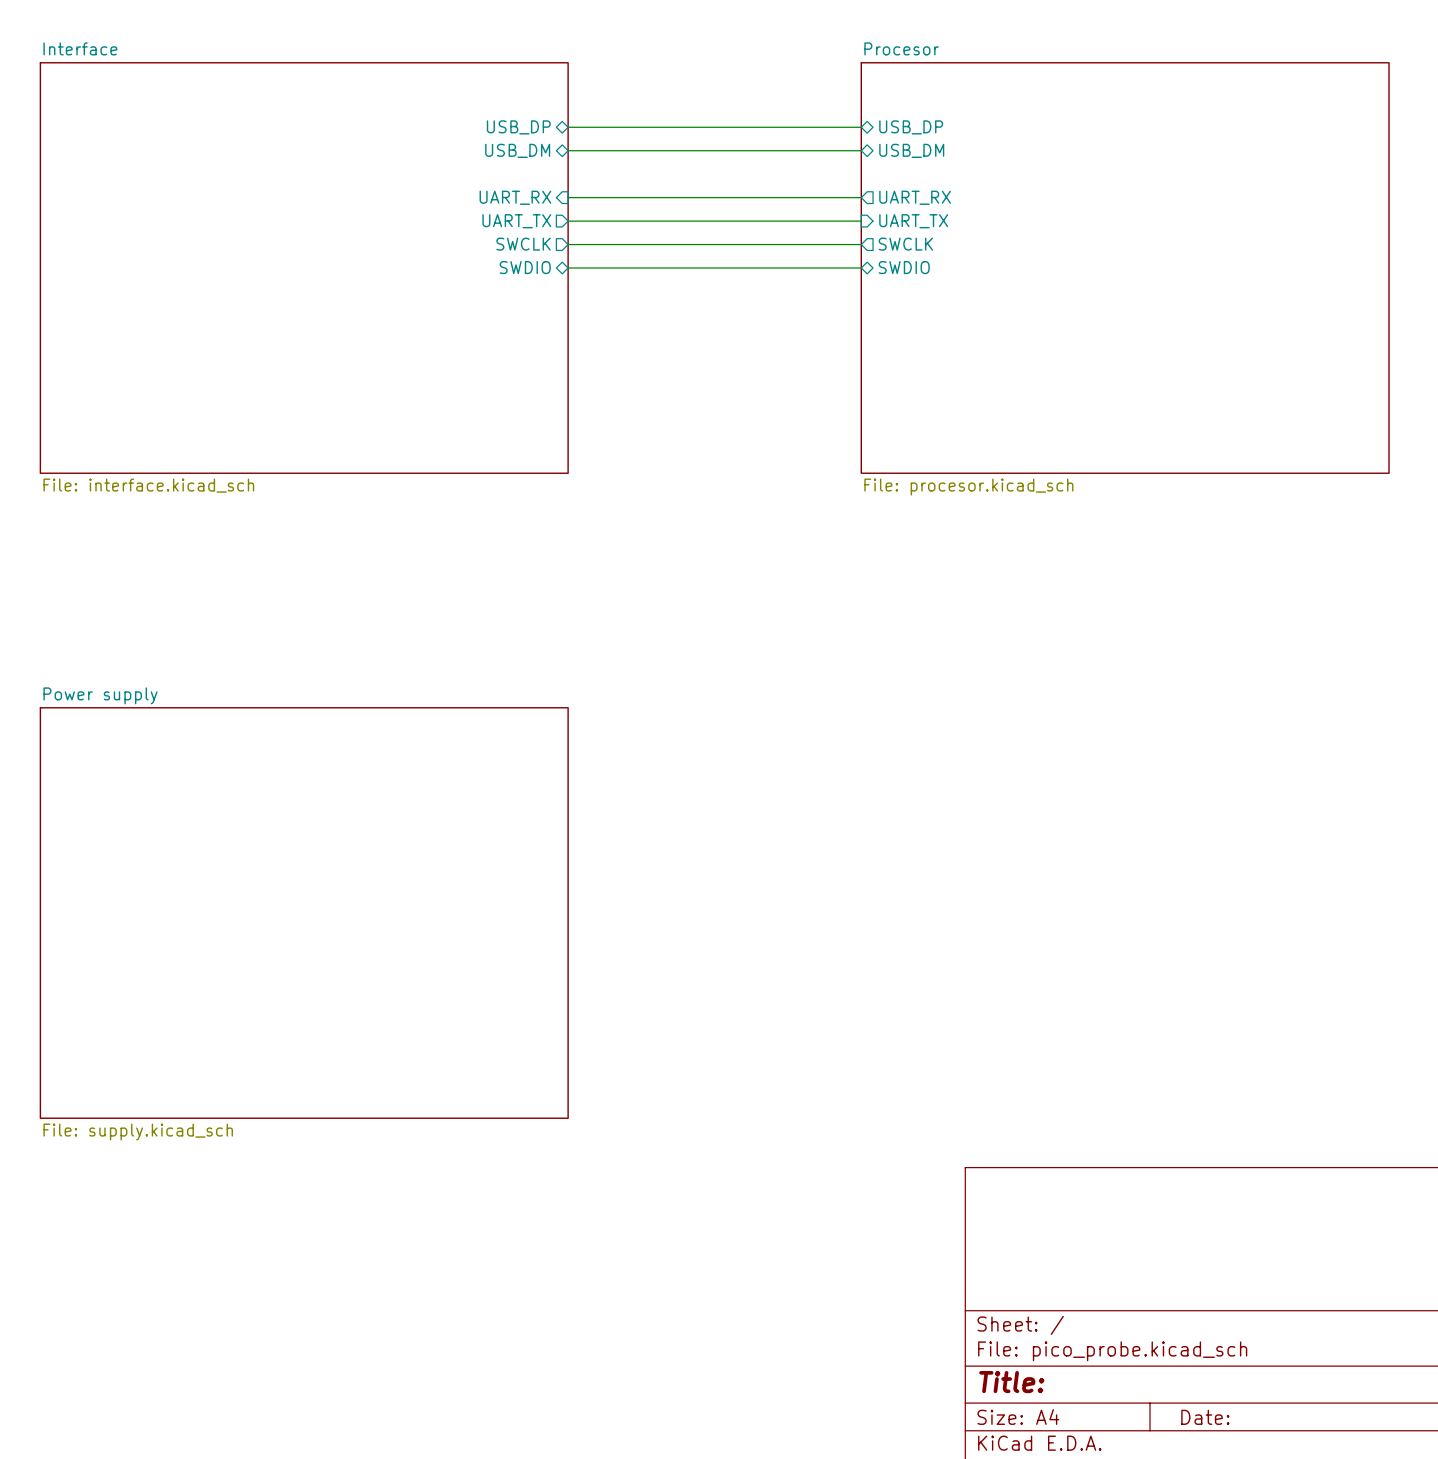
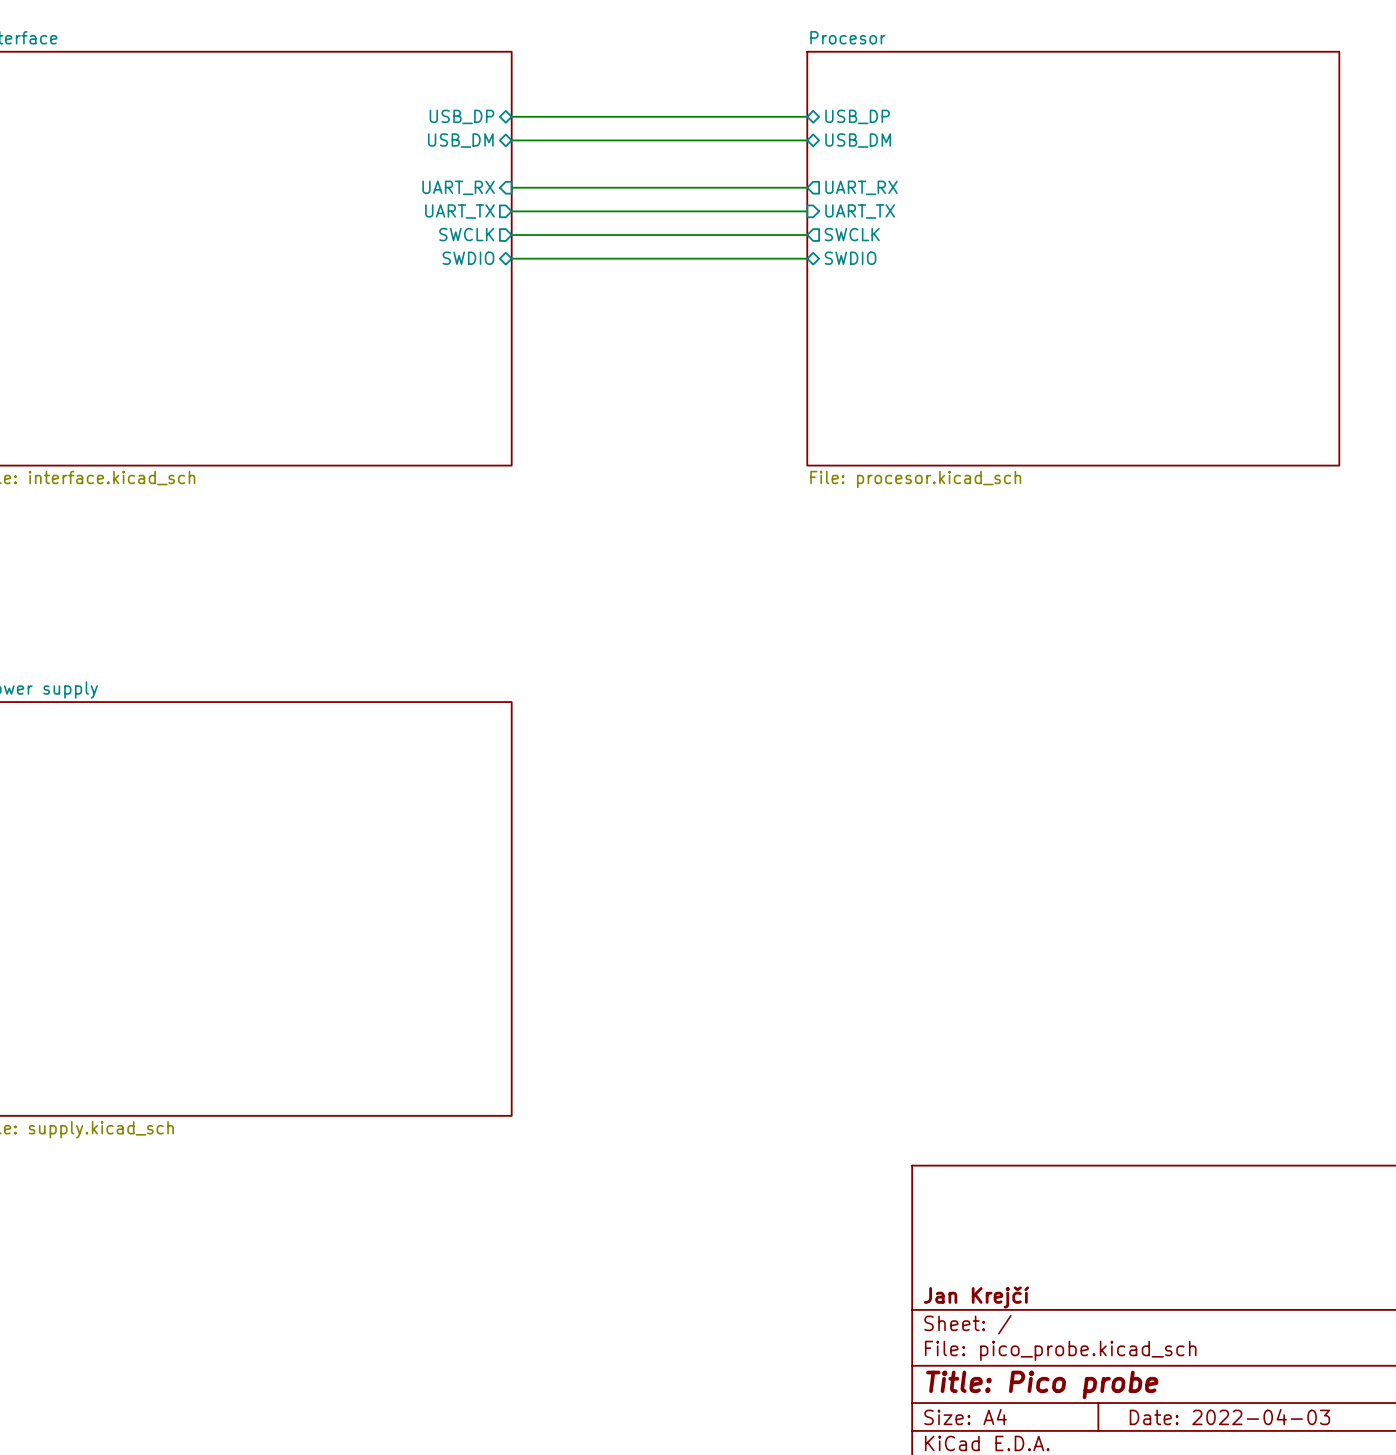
title block: none -> Jan Krejčí (976, 1297)
title block: Title: (1011, 1382) -> Title: Pico probe (1042, 1384)
title block: Date: (1205, 1417) -> Date: 2022-04-03 (1229, 1417)

